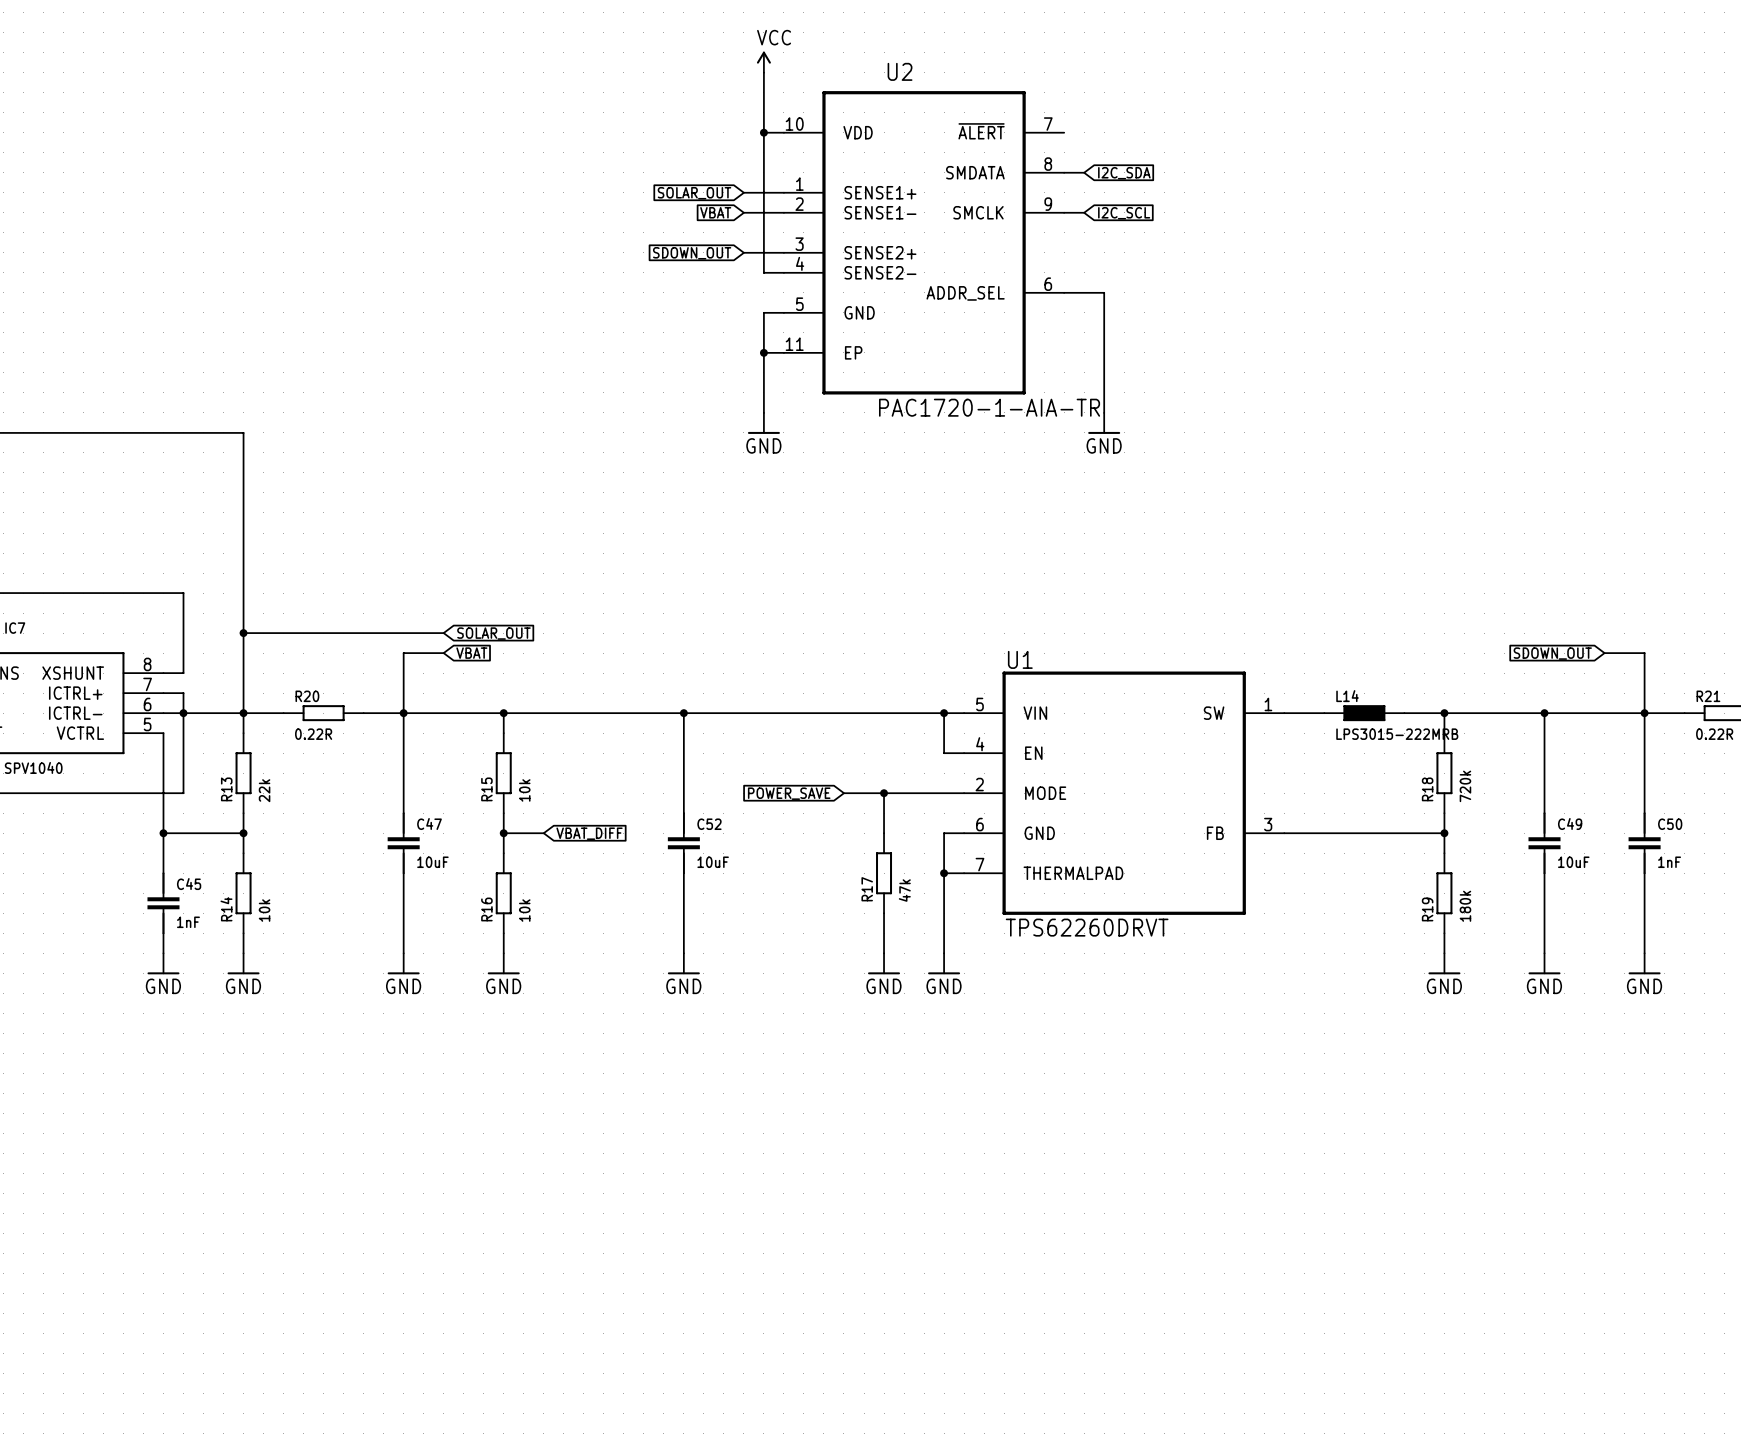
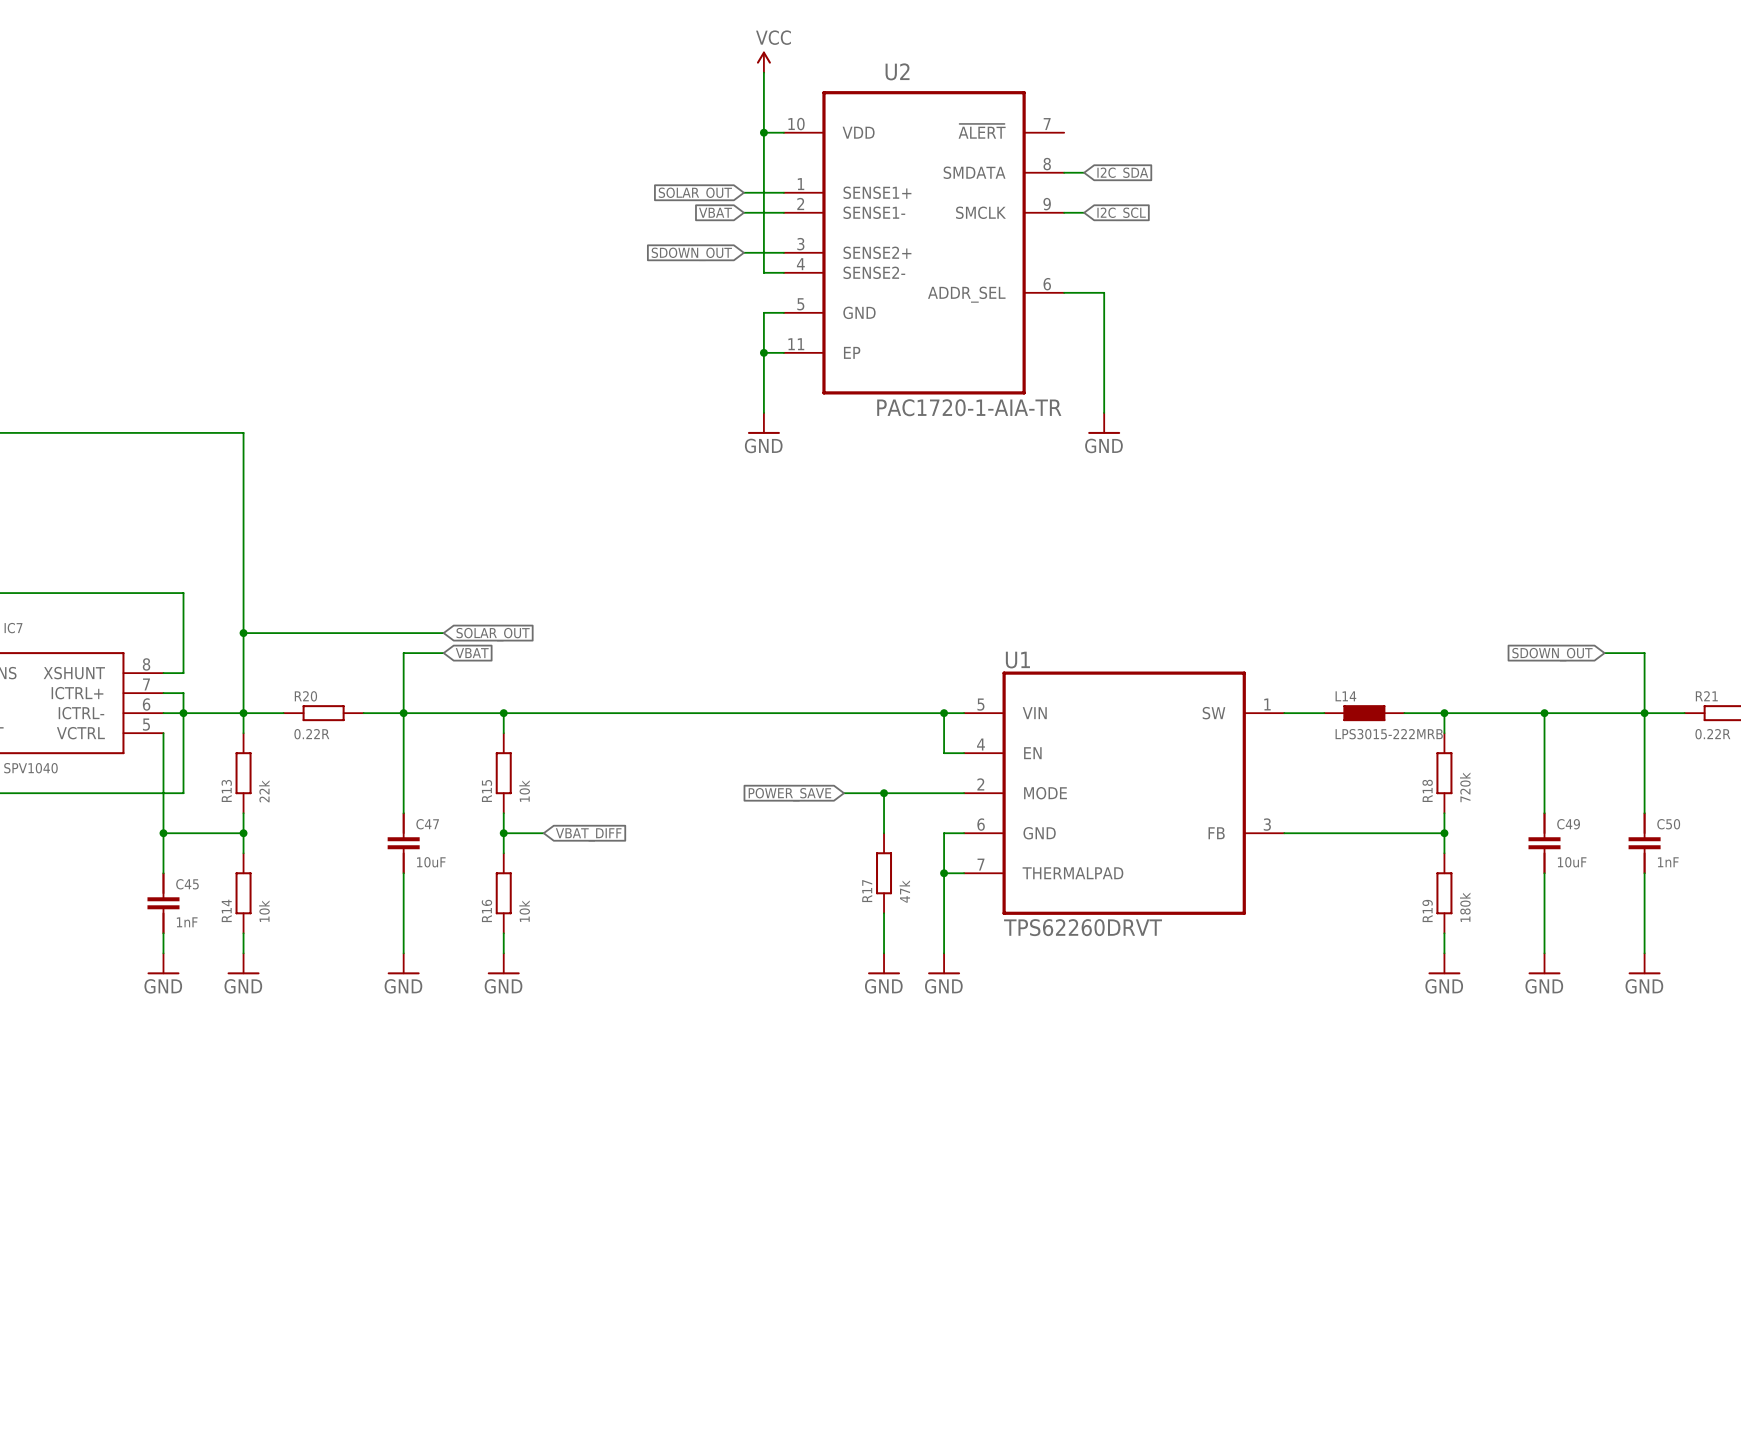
wire: (683, 713) (683, 813) -> none
junction: (683, 713) -> none
C52: 10uF (683, 843) -> none
wire: (683, 873) (683, 953) -> none
power symbol: GND (683, 963) -> none

